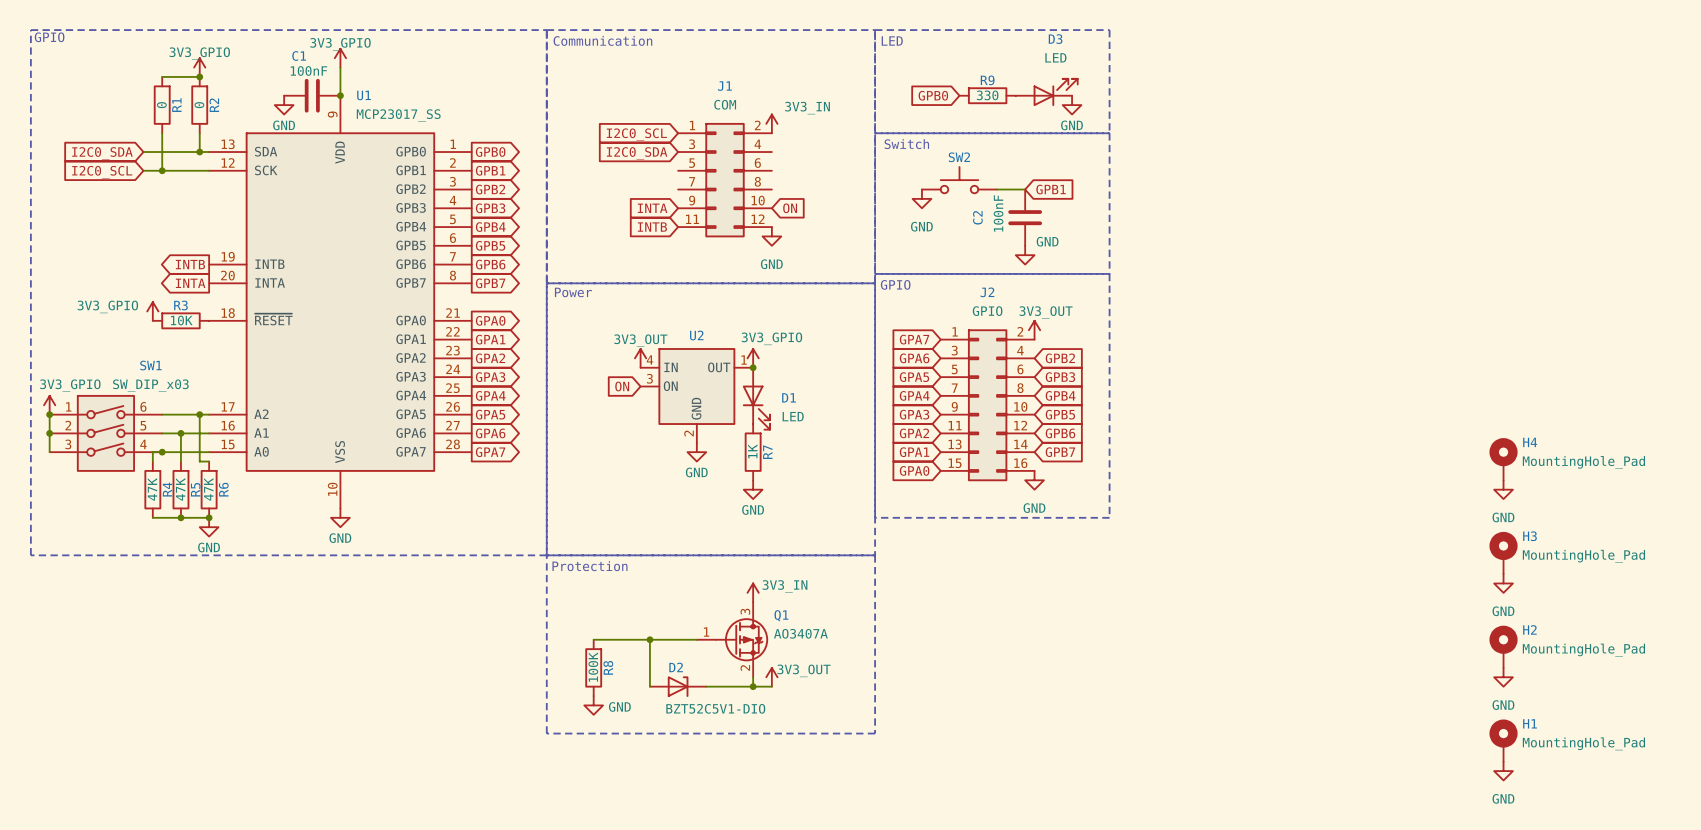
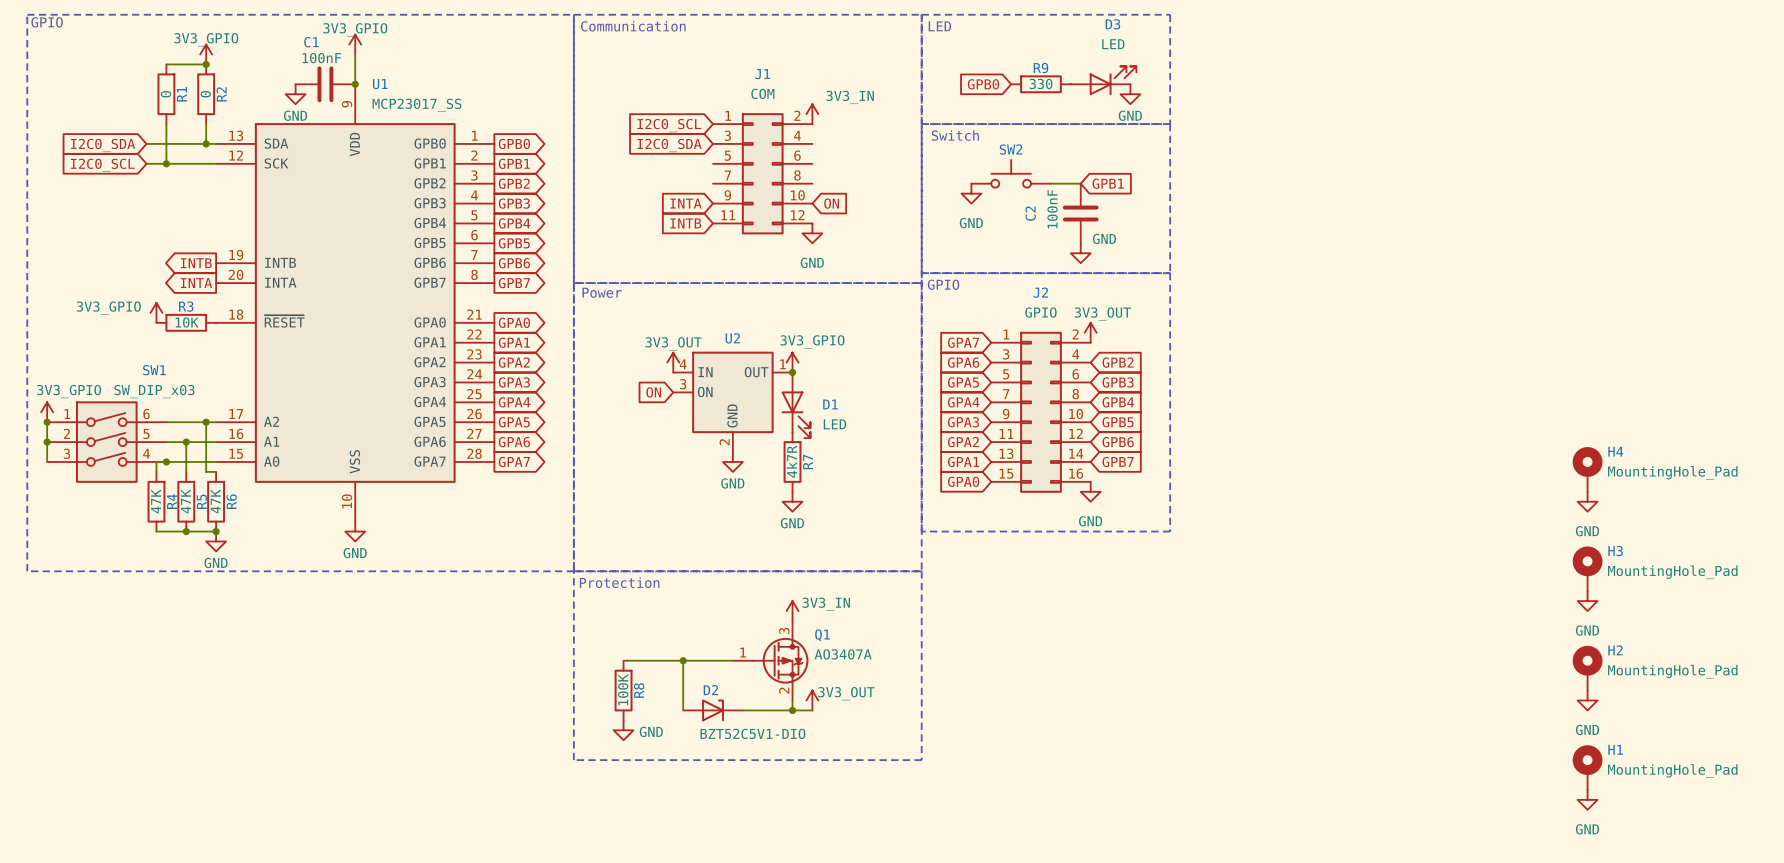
R7 value: 1K (752, 451) -> 4k7R (791, 461)

